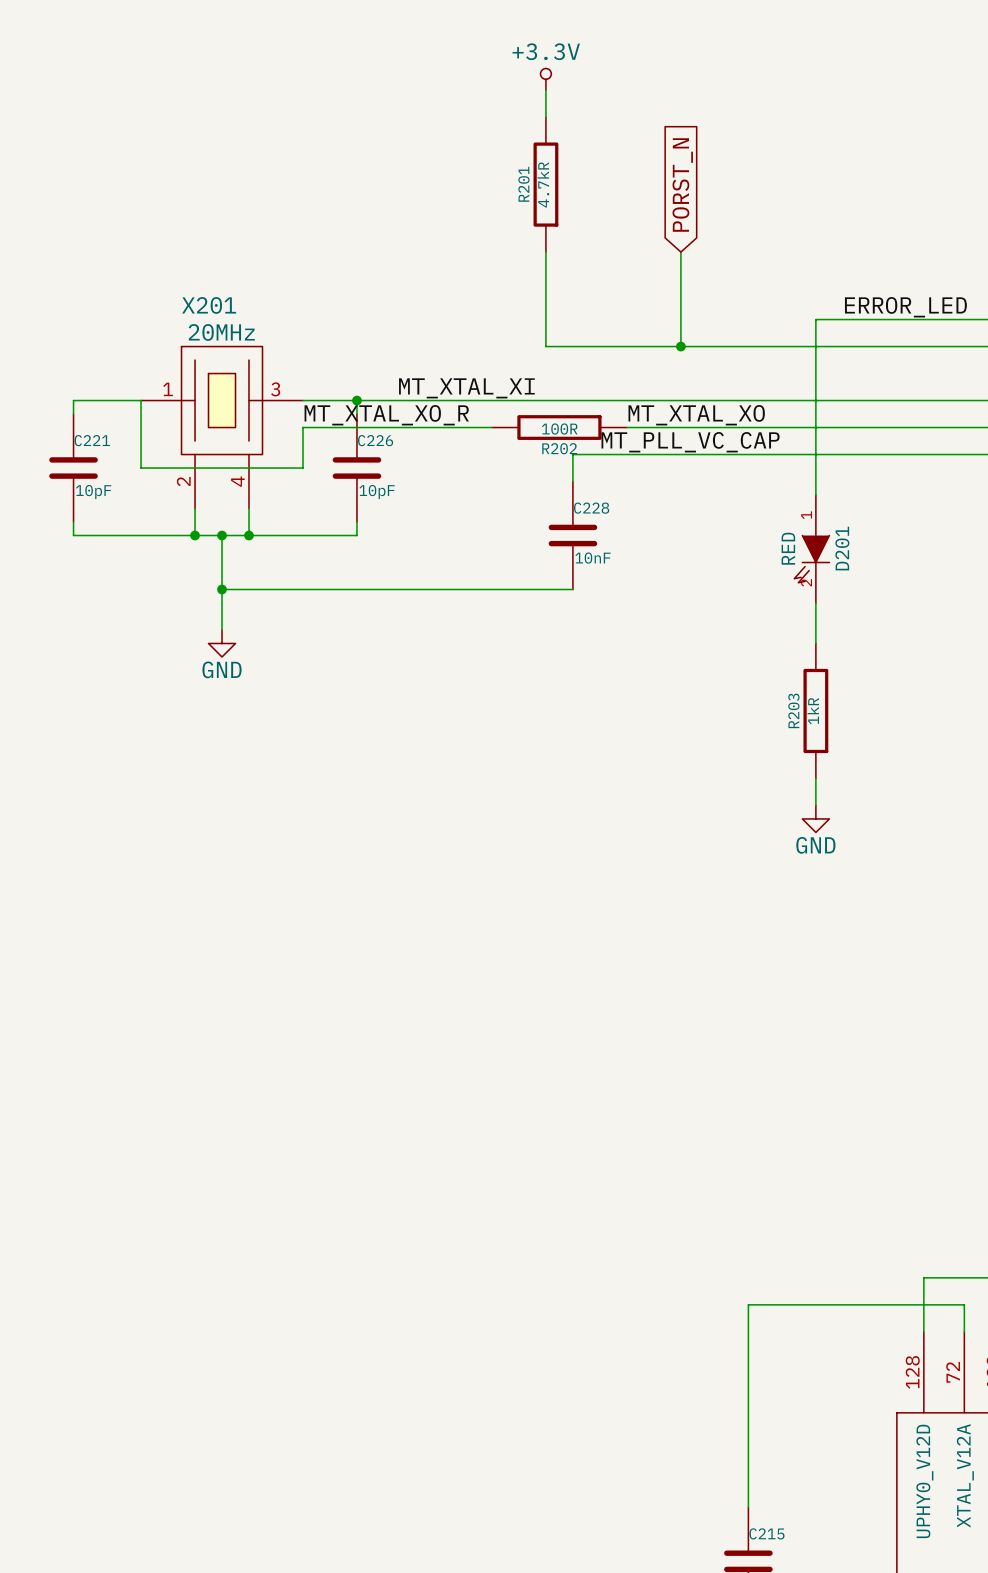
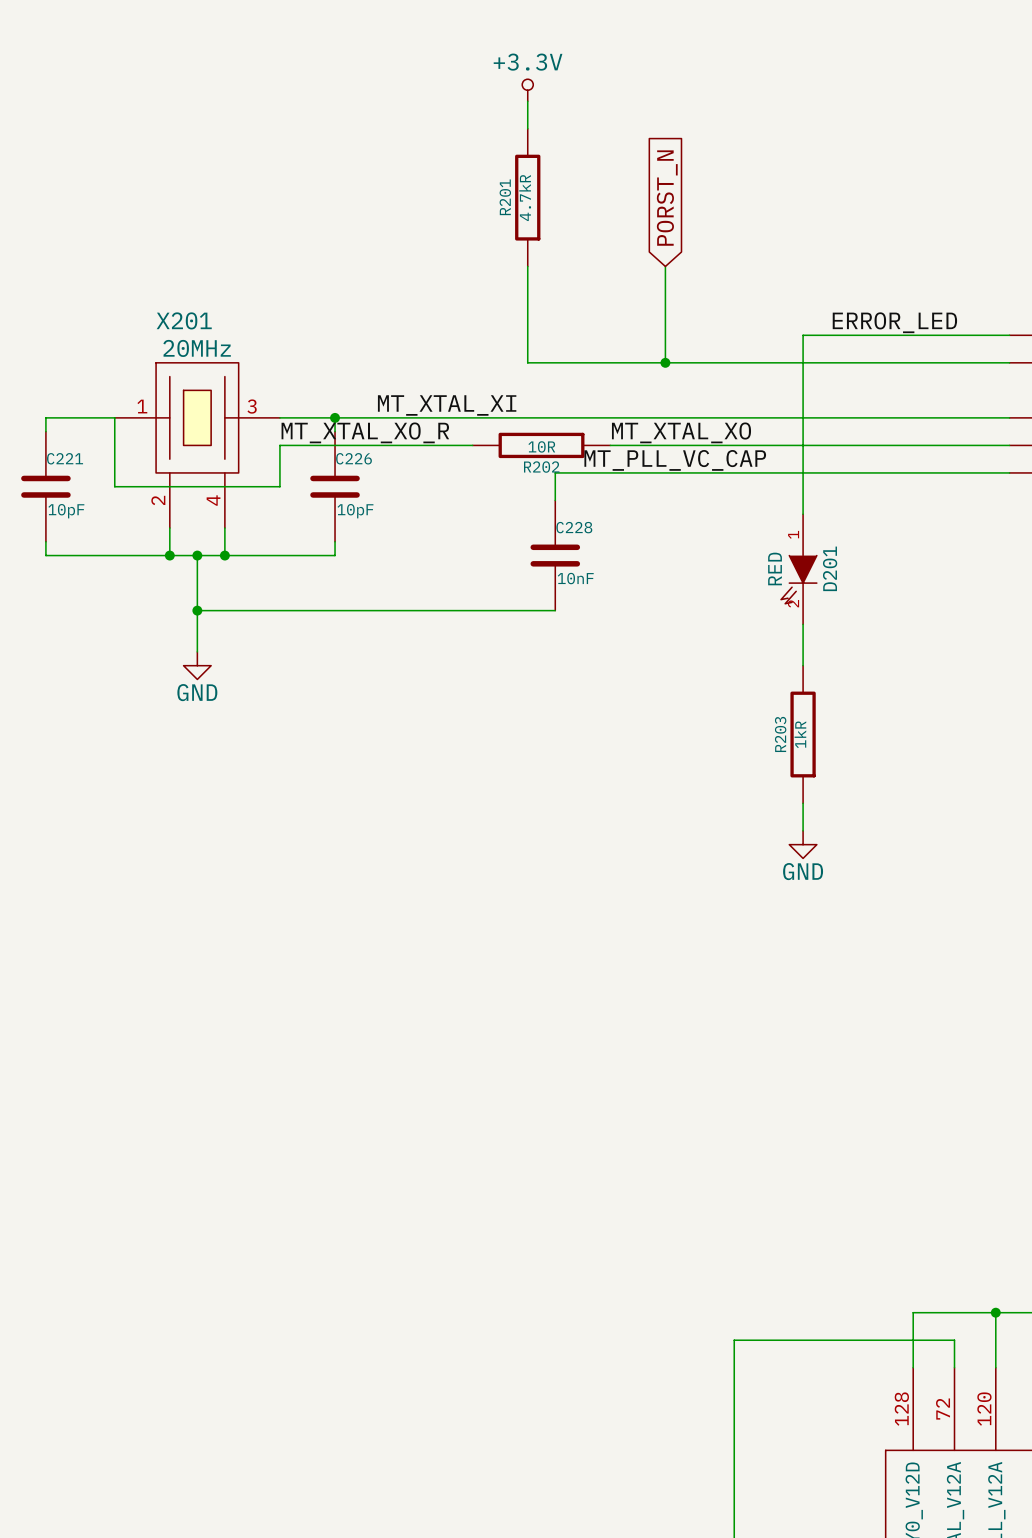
R202 value: 100R (559, 429) -> 10R (541, 446)

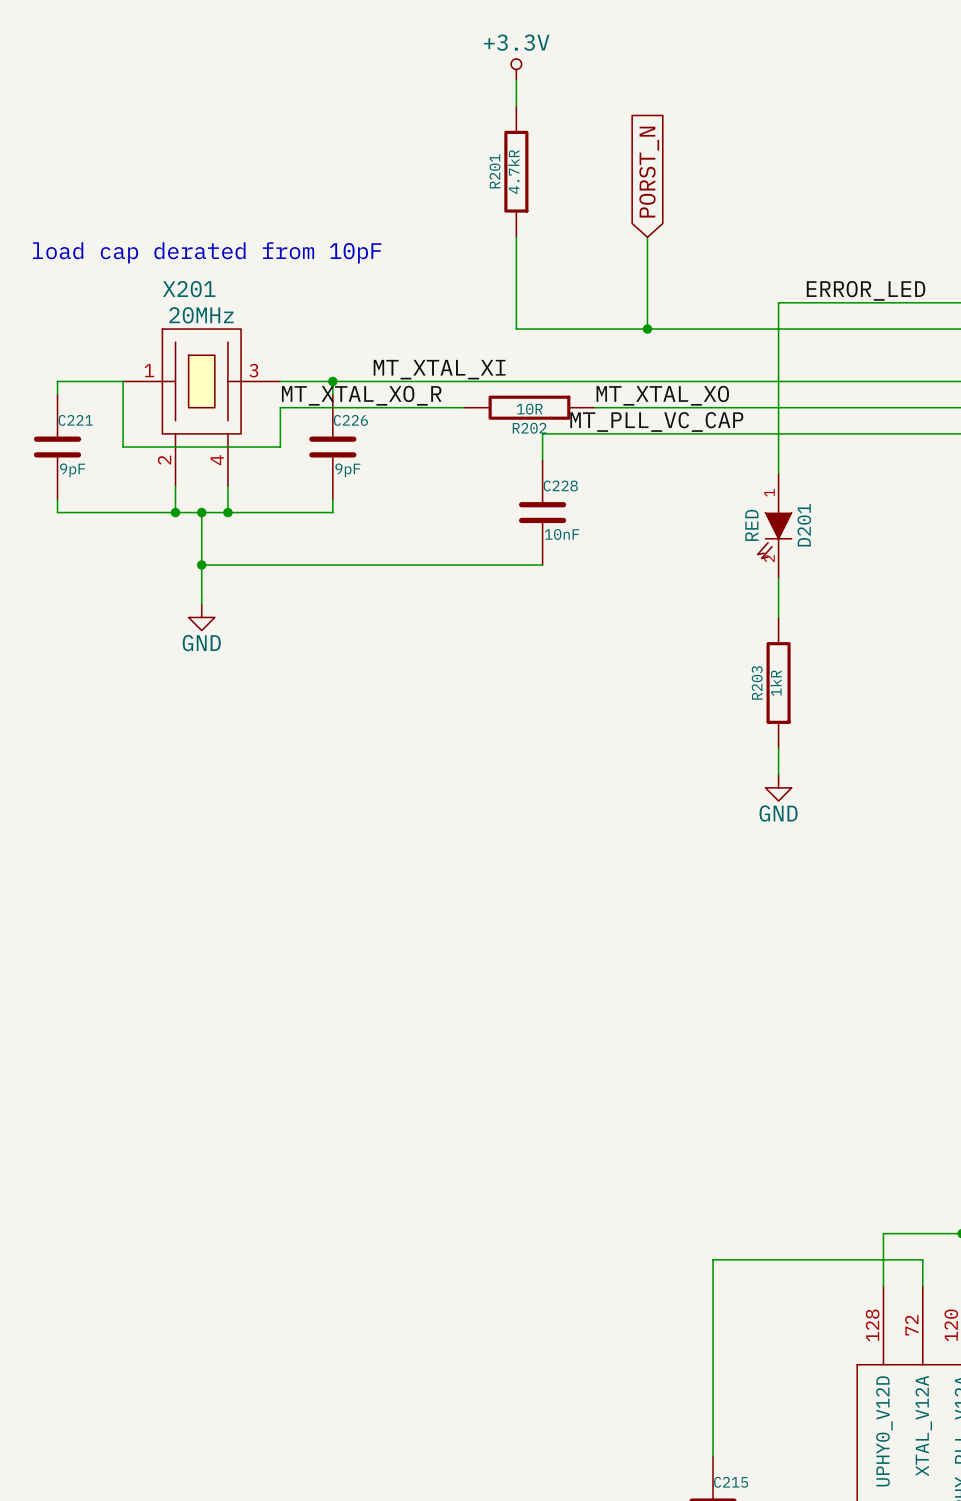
text: none -> load cap derated from 10pF (207, 252)
C221 value: 10pF (66, 511) -> 9pF (72, 470)
C226 value: 10pF (355, 511) -> 9pF (347, 470)

